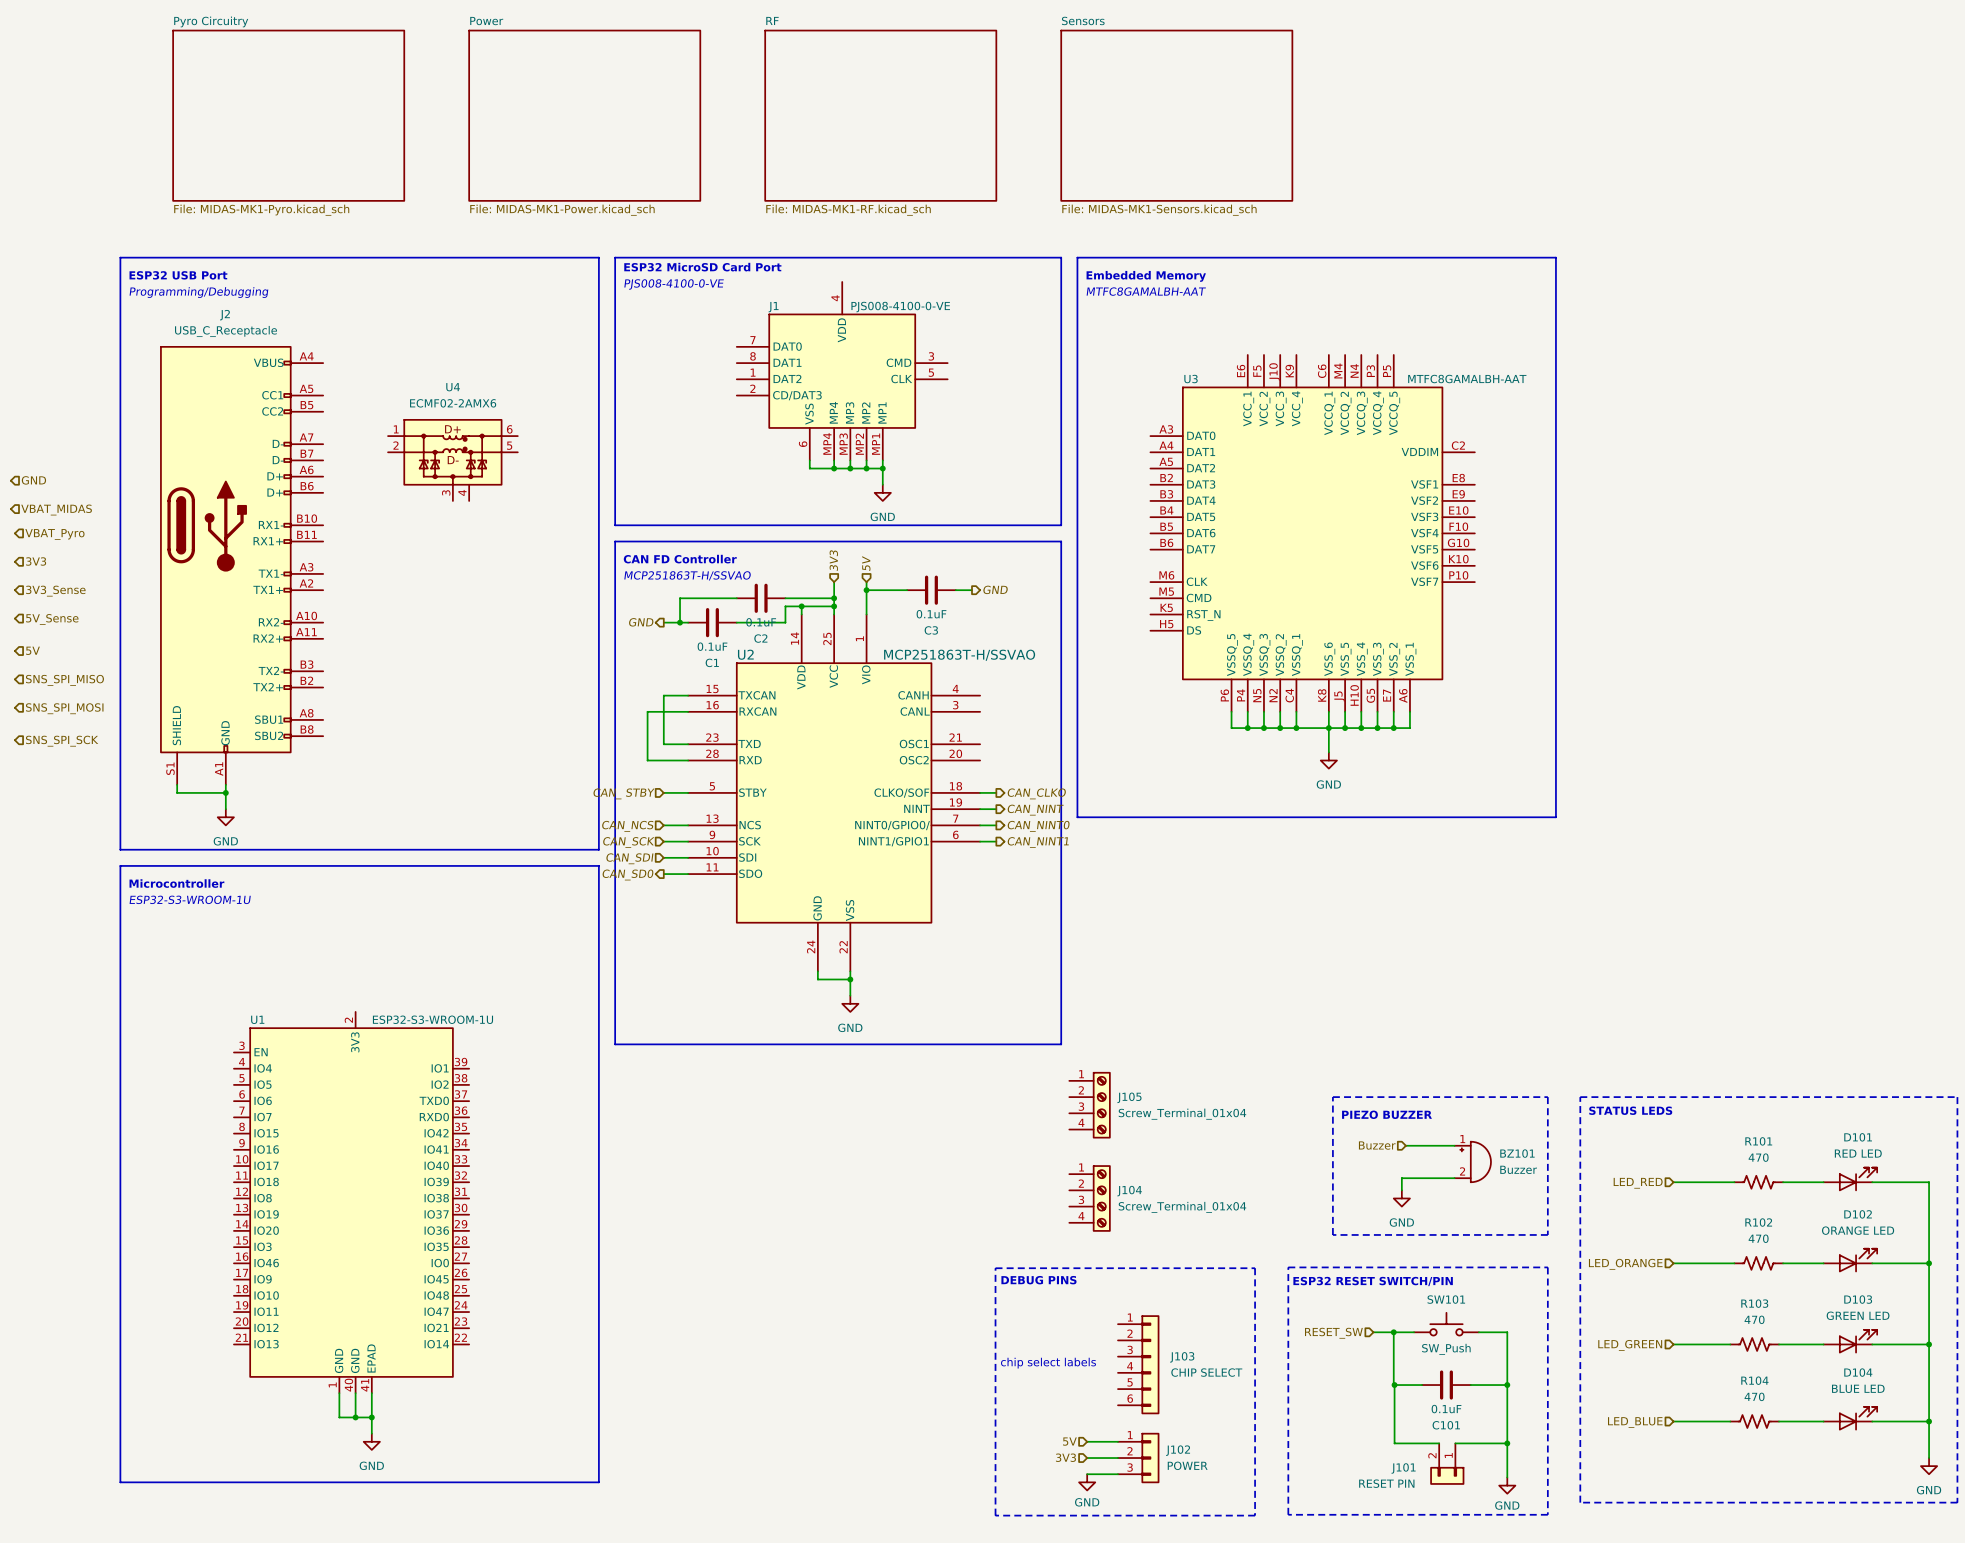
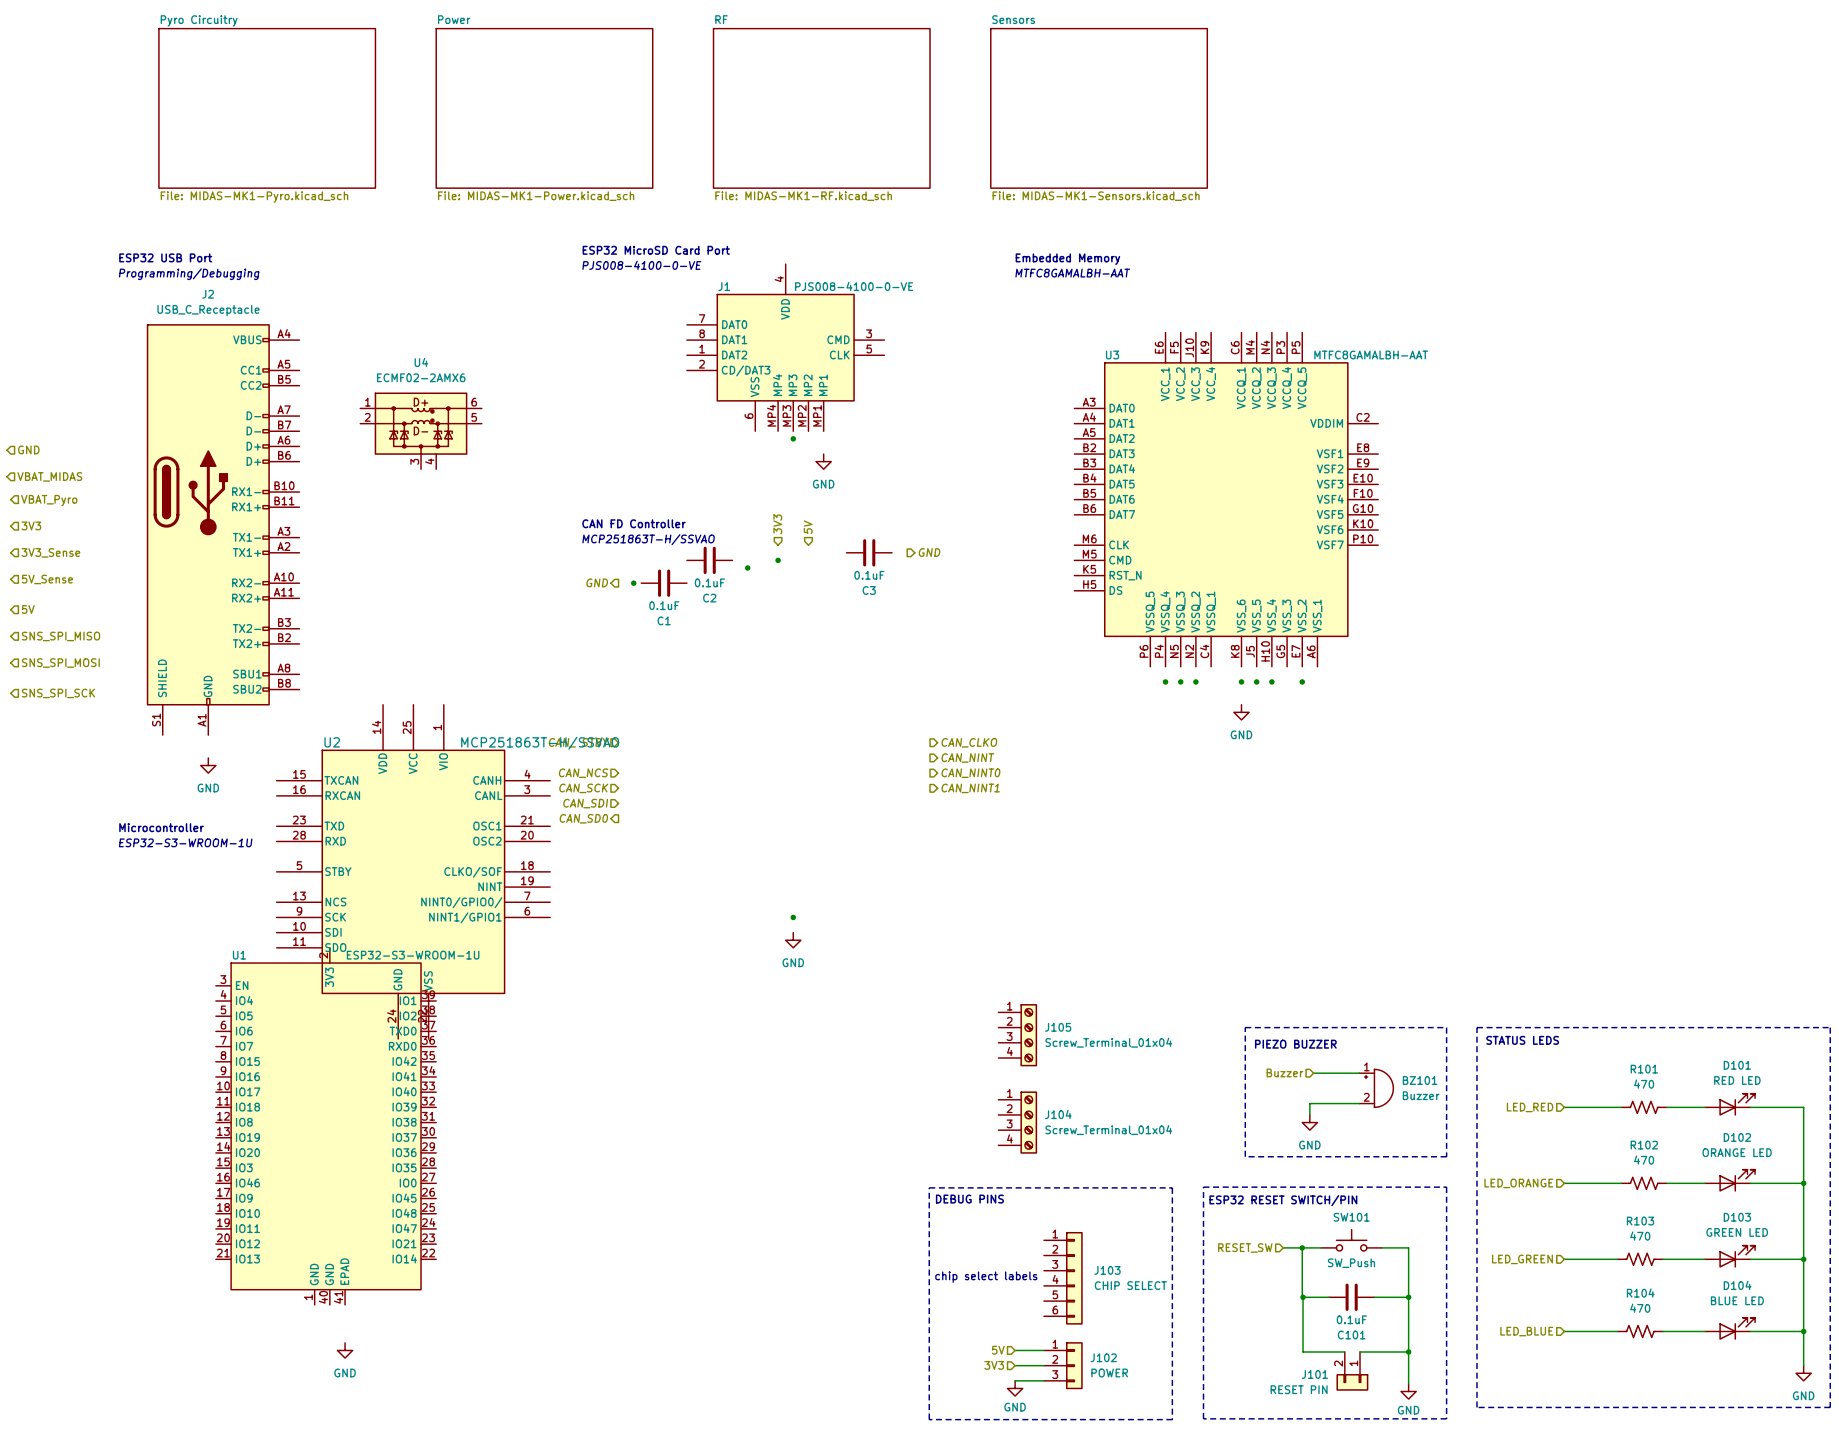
line: (120, 257) (598, 257) (598, 849) (120, 849) (120, 257) -> none
line: (615, 257) (1061, 257) (1061, 525) (615, 525) (615, 257) -> none
line: (1077, 257) (1555, 257) (1555, 817) (1077, 817) (1077, 257) -> none
wire: (809, 460) (809, 468) (882, 468) -> none
wire: (834, 460) (834, 468) -> none
wire: (850, 460) (850, 468) -> none
wire: (866, 460) (866, 468) -> none
wire: (882, 460) (882, 484) -> none
junction: (834, 468) -> none
junction: (866, 468) -> none
junction: (882, 468) -> none
line: (615, 541) (615, 1044) (1061, 1044) (1061, 541) (615, 541) -> none
wire: (834, 582) (834, 614) -> none
wire: (866, 582) (866, 614) -> none
wire: (866, 590) (907, 590) -> none
junction: (866, 590) -> none
wire: (955, 590) (972, 590) -> none
wire: (736, 598) (680, 598) (680, 622) -> none
wire: (785, 598) (834, 598) -> none
wire: (801, 606) (801, 614) -> none
wire: (834, 606) (785, 606) (785, 622) (736, 622) -> none
junction: (834, 606) -> none
wire: (663, 622) (688, 622) -> none
wire: (688, 695) (663, 695) (663, 744) (688, 744) -> none
wire: (688, 711) (647, 711) (647, 760) (688, 760) -> none
wire: (1231, 711) (1231, 728) (1409, 728) (1409, 711) -> none
wire: (1247, 711) (1247, 728) -> none
wire: (1263, 711) (1263, 728) -> none
wire: (1280, 711) (1280, 728) -> none
wire: (1296, 711) (1296, 728) -> none
wire: (1328, 711) (1328, 752) -> none
wire: (1345, 711) (1345, 728) -> none
wire: (1361, 711) (1361, 728) -> none
wire: (1377, 711) (1377, 728) -> none
wire: (1393, 711) (1393, 728) -> none
junction: (1296, 728) -> none
junction: (1377, 728) -> none
wire: (177, 784) (177, 792) (225, 792) -> none
wire: (225, 784) (225, 809) -> none
junction: (225, 792) -> none
wire: (663, 792) (688, 792) -> none
U2 position: (834, 792) -> (413, 871)
wire: (980, 792) (996, 792) -> none
wire: (980, 809) (996, 809) -> none
wire: (663, 825) (688, 825) -> none
wire: (980, 825) (996, 825) -> none
wire: (663, 841) (688, 841) -> none
wire: (980, 841) (996, 841) -> none
wire: (663, 857) (688, 857) -> none
line: (120, 865) (598, 865) (598, 1482) (120, 1482) (120, 865) -> none
wire: (663, 874) (688, 874) -> none
wire: (817, 971) (817, 979) (850, 979) -> none
wire: (850, 971) (850, 995) -> none
wire: (339, 1393) (339, 1417) (371, 1417) -> none
wire: (355, 1393) (355, 1417) -> none
wire: (371, 1393) (371, 1433) -> none
junction: (355, 1417) -> none
junction: (371, 1417) -> none

